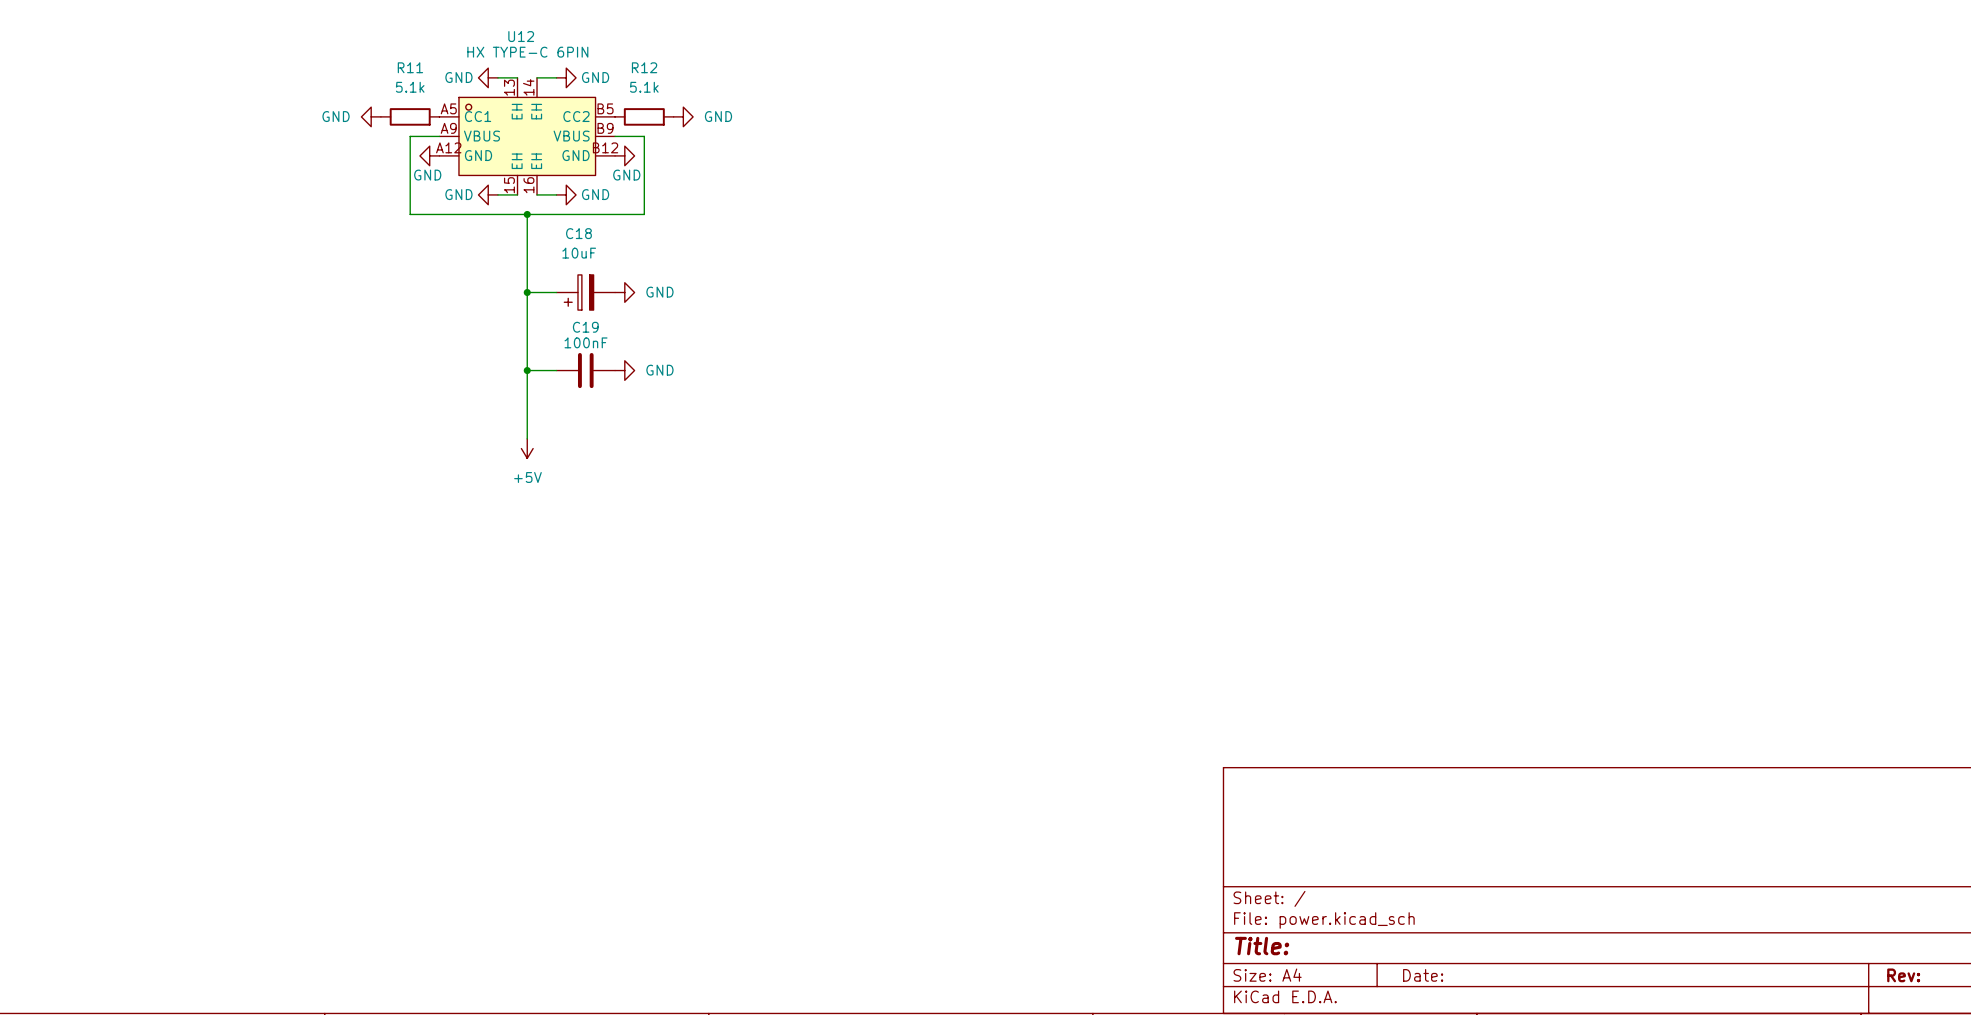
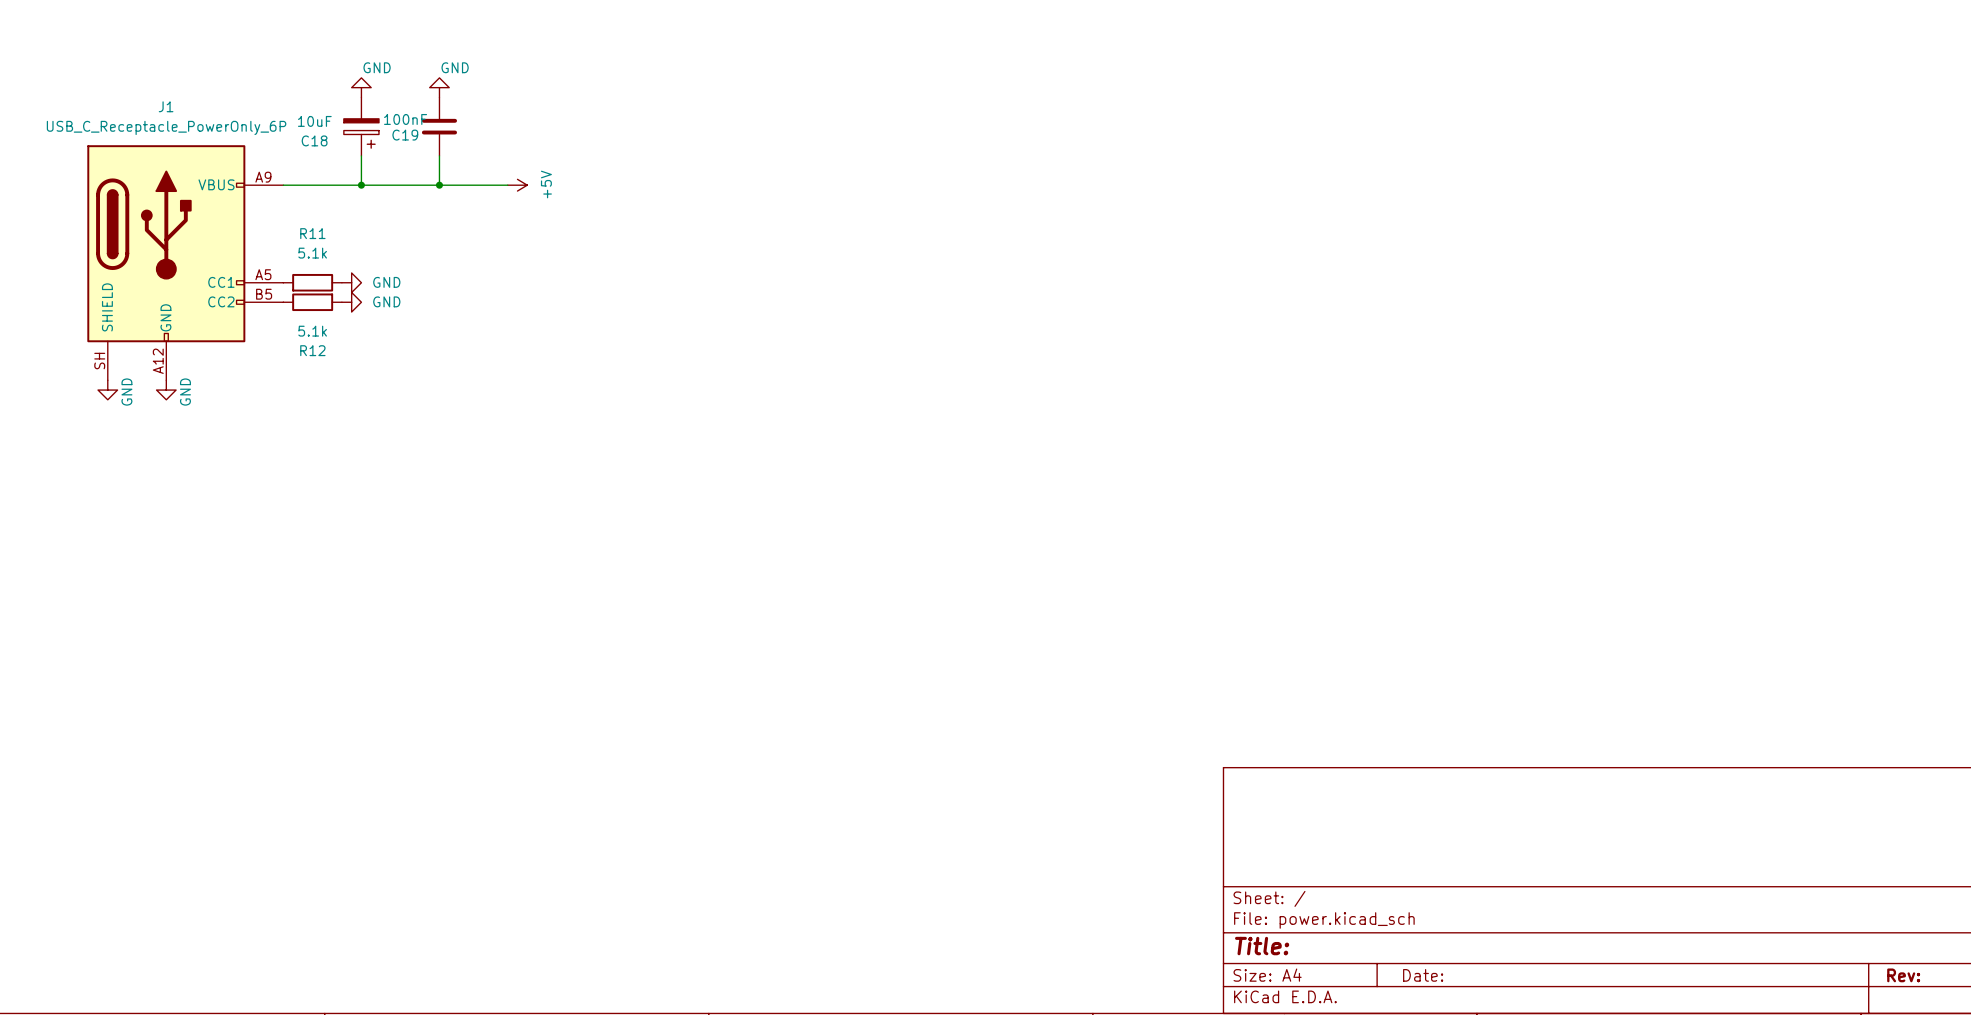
R12 name position: R12 (644, 67) -> R12 (312, 350)
power symbol: GND (488, 77) -> none
wire: (497, 77) (517, 77) -> none
wire: (537, 77) (556, 77) -> none
power symbol: GND (566, 77) -> none
power symbol: none -> GND (439, 87)
R12 value position: 5.1k (644, 87) -> 5.1k (312, 331)
power symbol text position: GND (336, 116) -> GND (377, 67)
power symbol rotation: 0° (371, 116) -> 90° clockwise (361, 87)
power symbol position: GND (371, 116) -> GND (361, 87)
R11 position: (410, 116) -> (312, 282)
R12 position: (644, 116) -> (312, 302)
power symbol: GND (683, 116) -> none
wire: (439, 136) (410, 136) (410, 214) (644, 214) (644, 136) (615, 136) -> none
U12: HX TYPE-C 6PIN (527, 136) -> none
wire: none -> (361, 155) (361, 185)
power symbol: GND (429, 155) -> none
wire: none -> (439, 155) (439, 185)
power symbol: GND (624, 155) -> none
wire: none -> (283, 185) (507, 185)
junction: none -> (361, 185)
junction: none -> (439, 185)
power symbol: none -> +5V (517, 185)
power symbol: GND (488, 194) -> none
wire: (497, 194) (517, 194) -> none
wire: (537, 194) (556, 194) -> none
power symbol: GND (566, 194) -> none
wire: (527, 214) (527, 438) -> none
junction: (527, 214) -> none
J1: none -> USB_C_Receptacle_PowerOnly_6P (185, 262)
power symbol: none -> GND (351, 282)
wire: (527, 292) (556, 292) -> none
junction: (527, 292) -> none
C18 rotation: 0° (578, 292) -> 90° counterclockwise (361, 133)
C18 position: (585, 292) -> (361, 126)
power symbol: GND (624, 292) -> none
power symbol: none -> GND (351, 302)
C19 name position: C19 (585, 327) -> C19 (405, 135)
C19 value position: 100nF (586, 342) -> 100nF (405, 119)
wire: (527, 370) (556, 370) -> none
junction: (527, 370) -> none
C19 rotation: 0° (585, 370) -> 90° clockwise (439, 126)
C19 position: (585, 370) -> (439, 126)
power symbol: GND (624, 370) -> none
power symbol: none -> GND (107, 390)
power symbol: none -> GND (166, 390)
power symbol: +5V (527, 448) -> none

